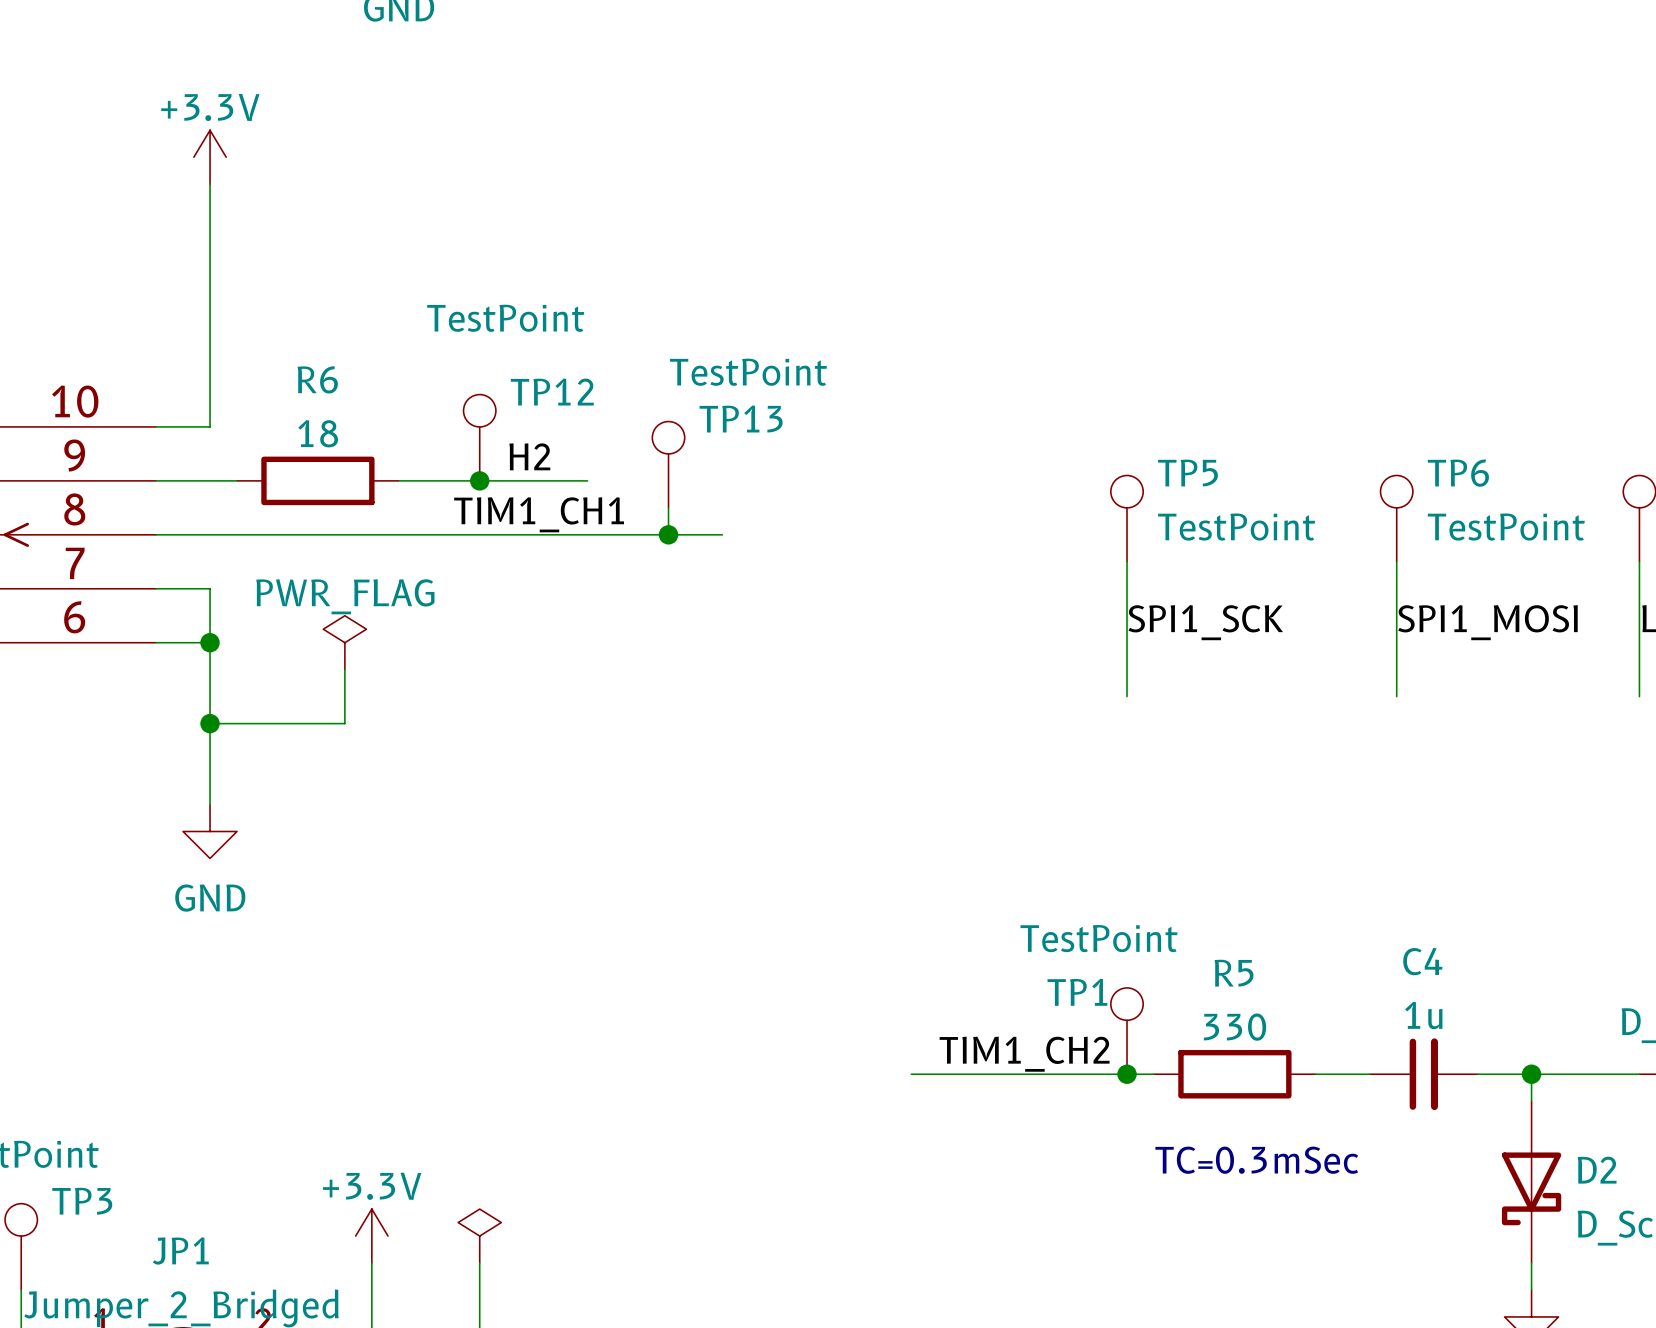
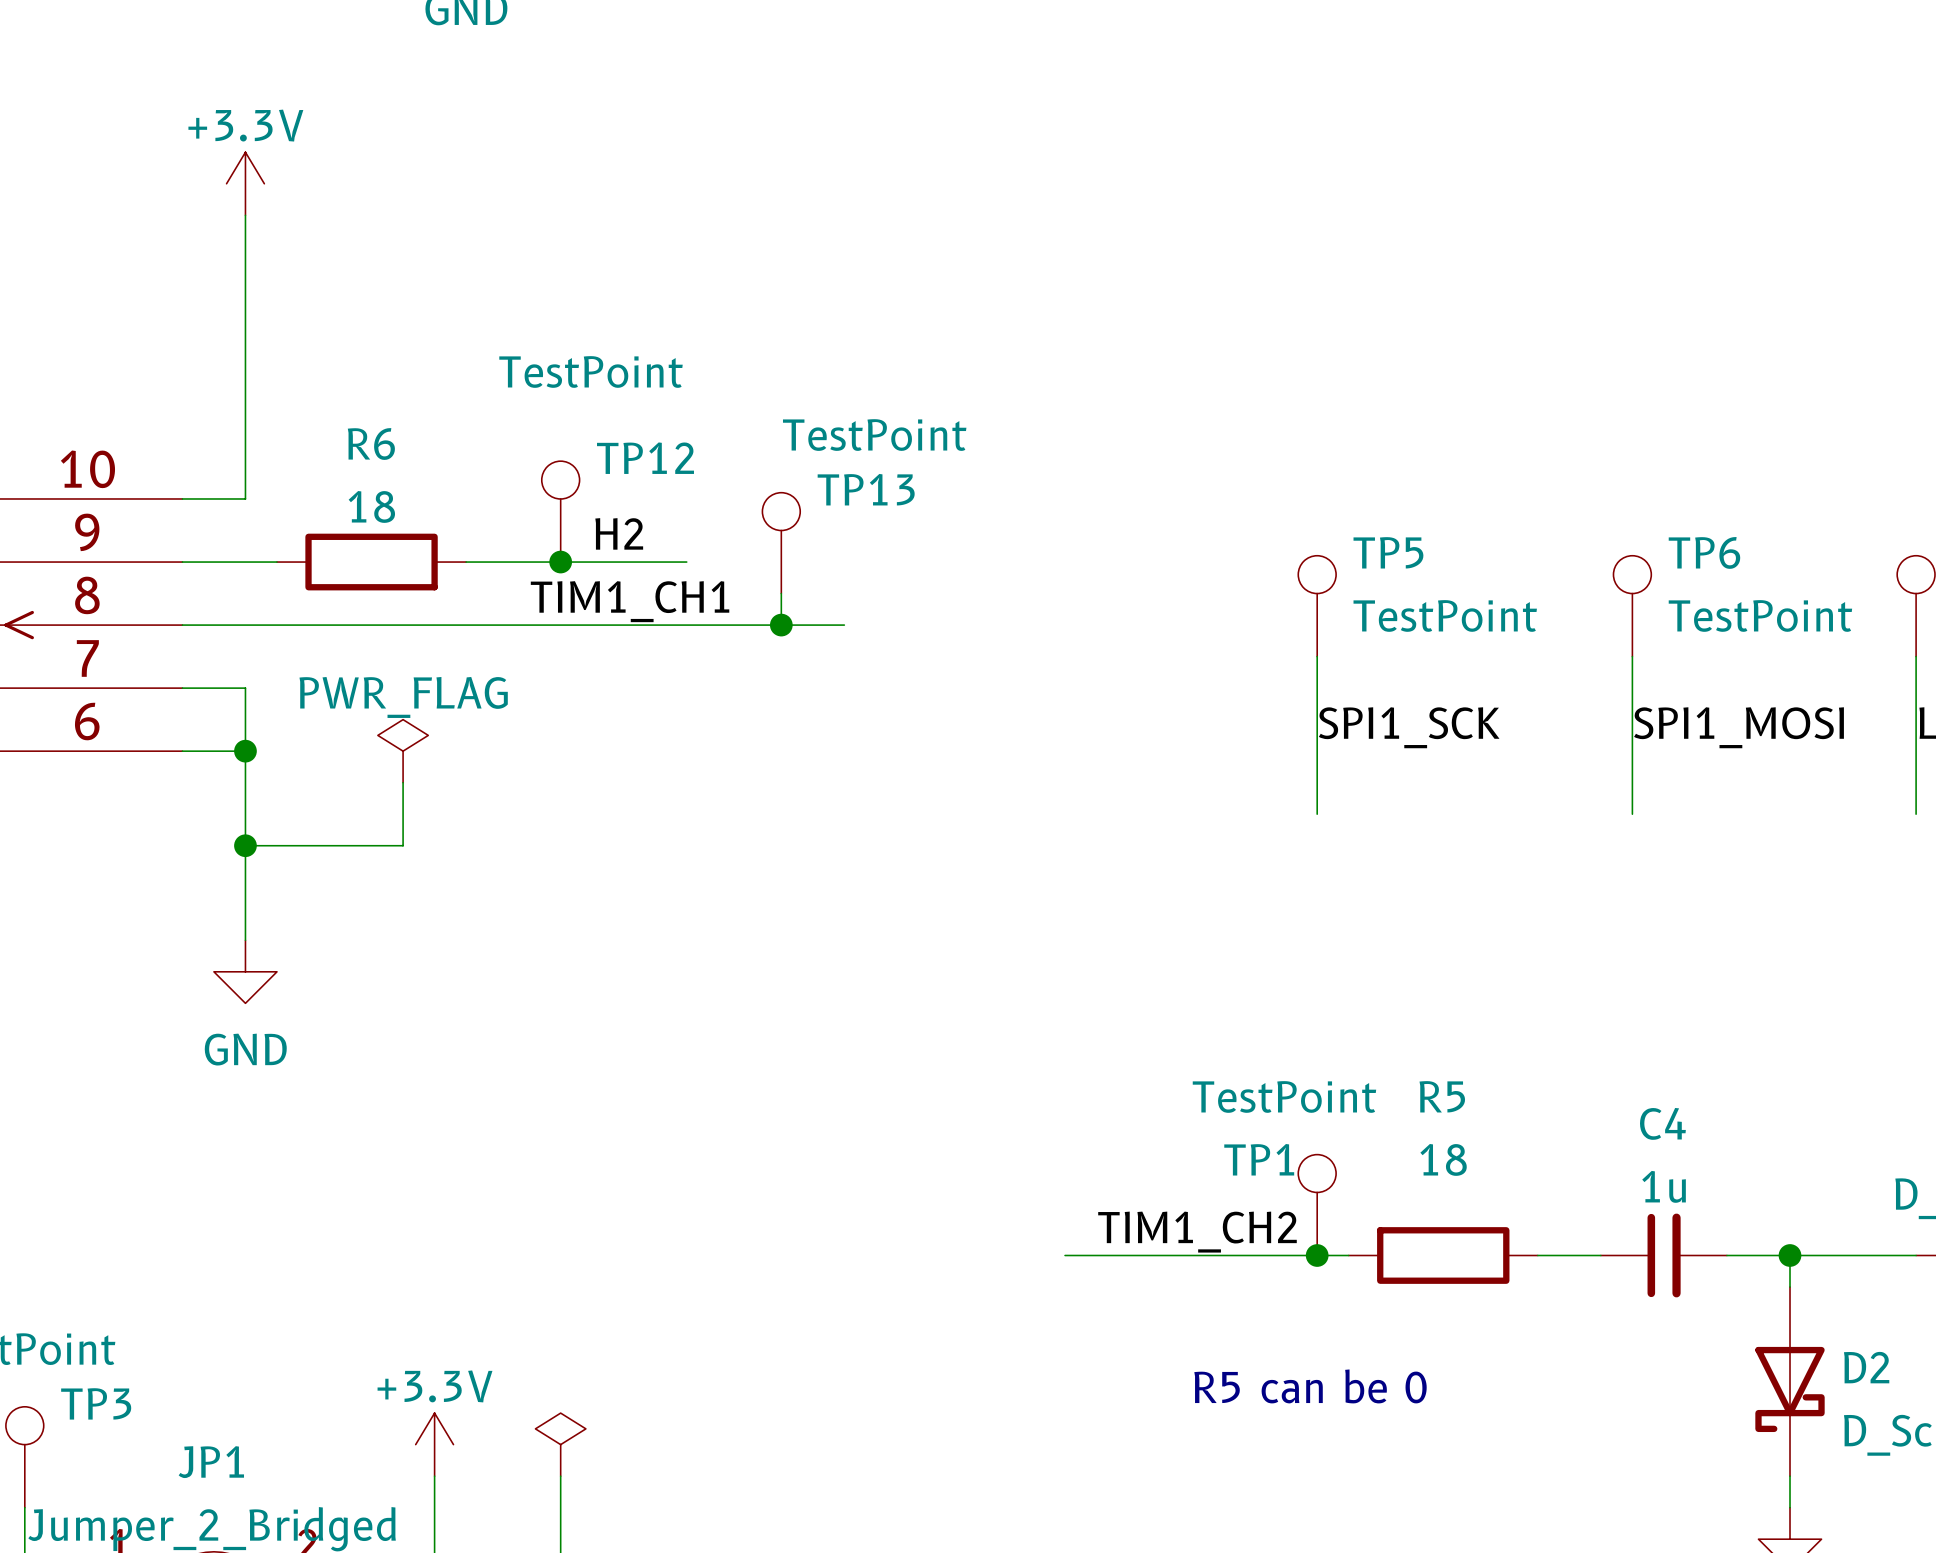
R5 name position: R5 (1234, 973) -> R5 (1442, 1096)
R5 value: 330 (1234, 1027) -> 18 (1443, 1159)
text: TC=0.3mSec (1256, 1160) -> none
text: none -> R5 can be 0 (1310, 1386)

